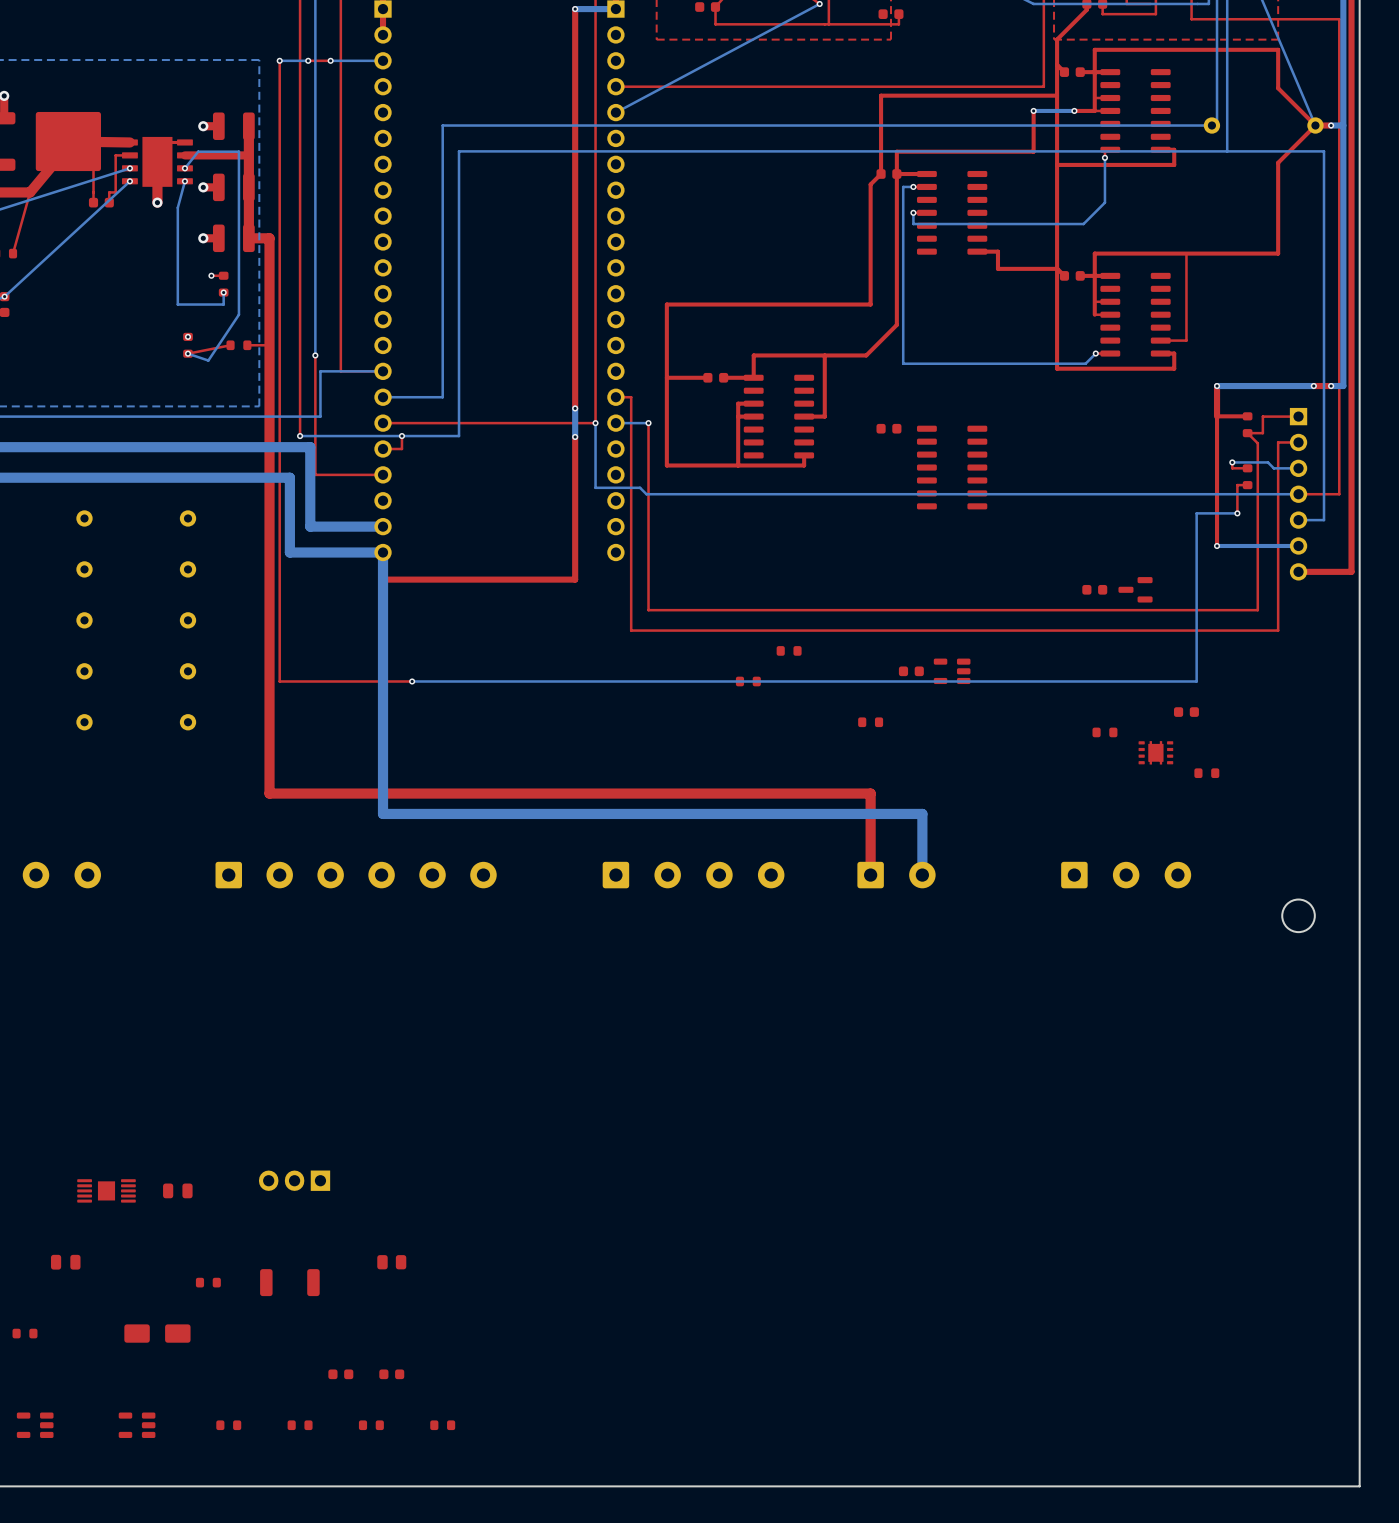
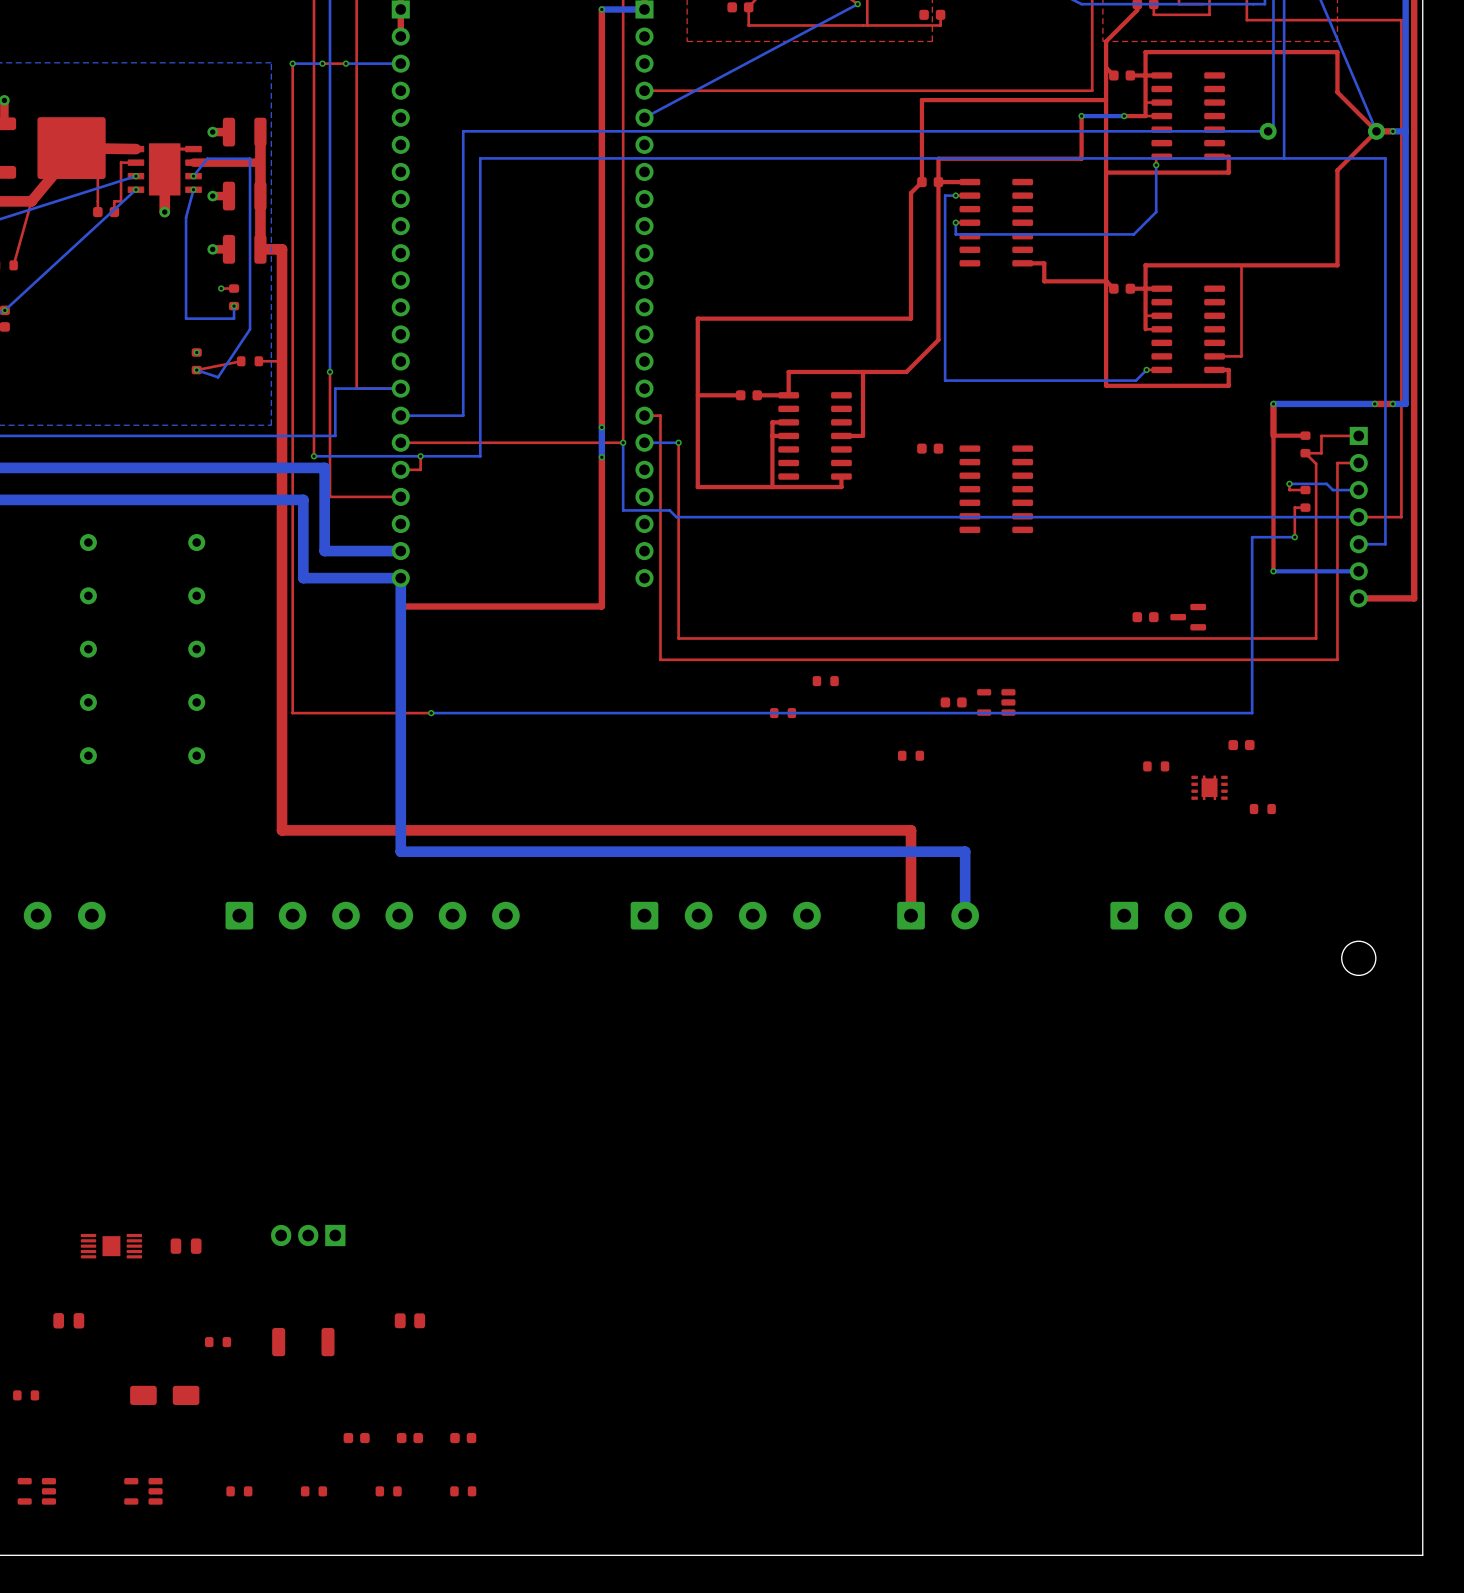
part: none -> (463, 1438)

